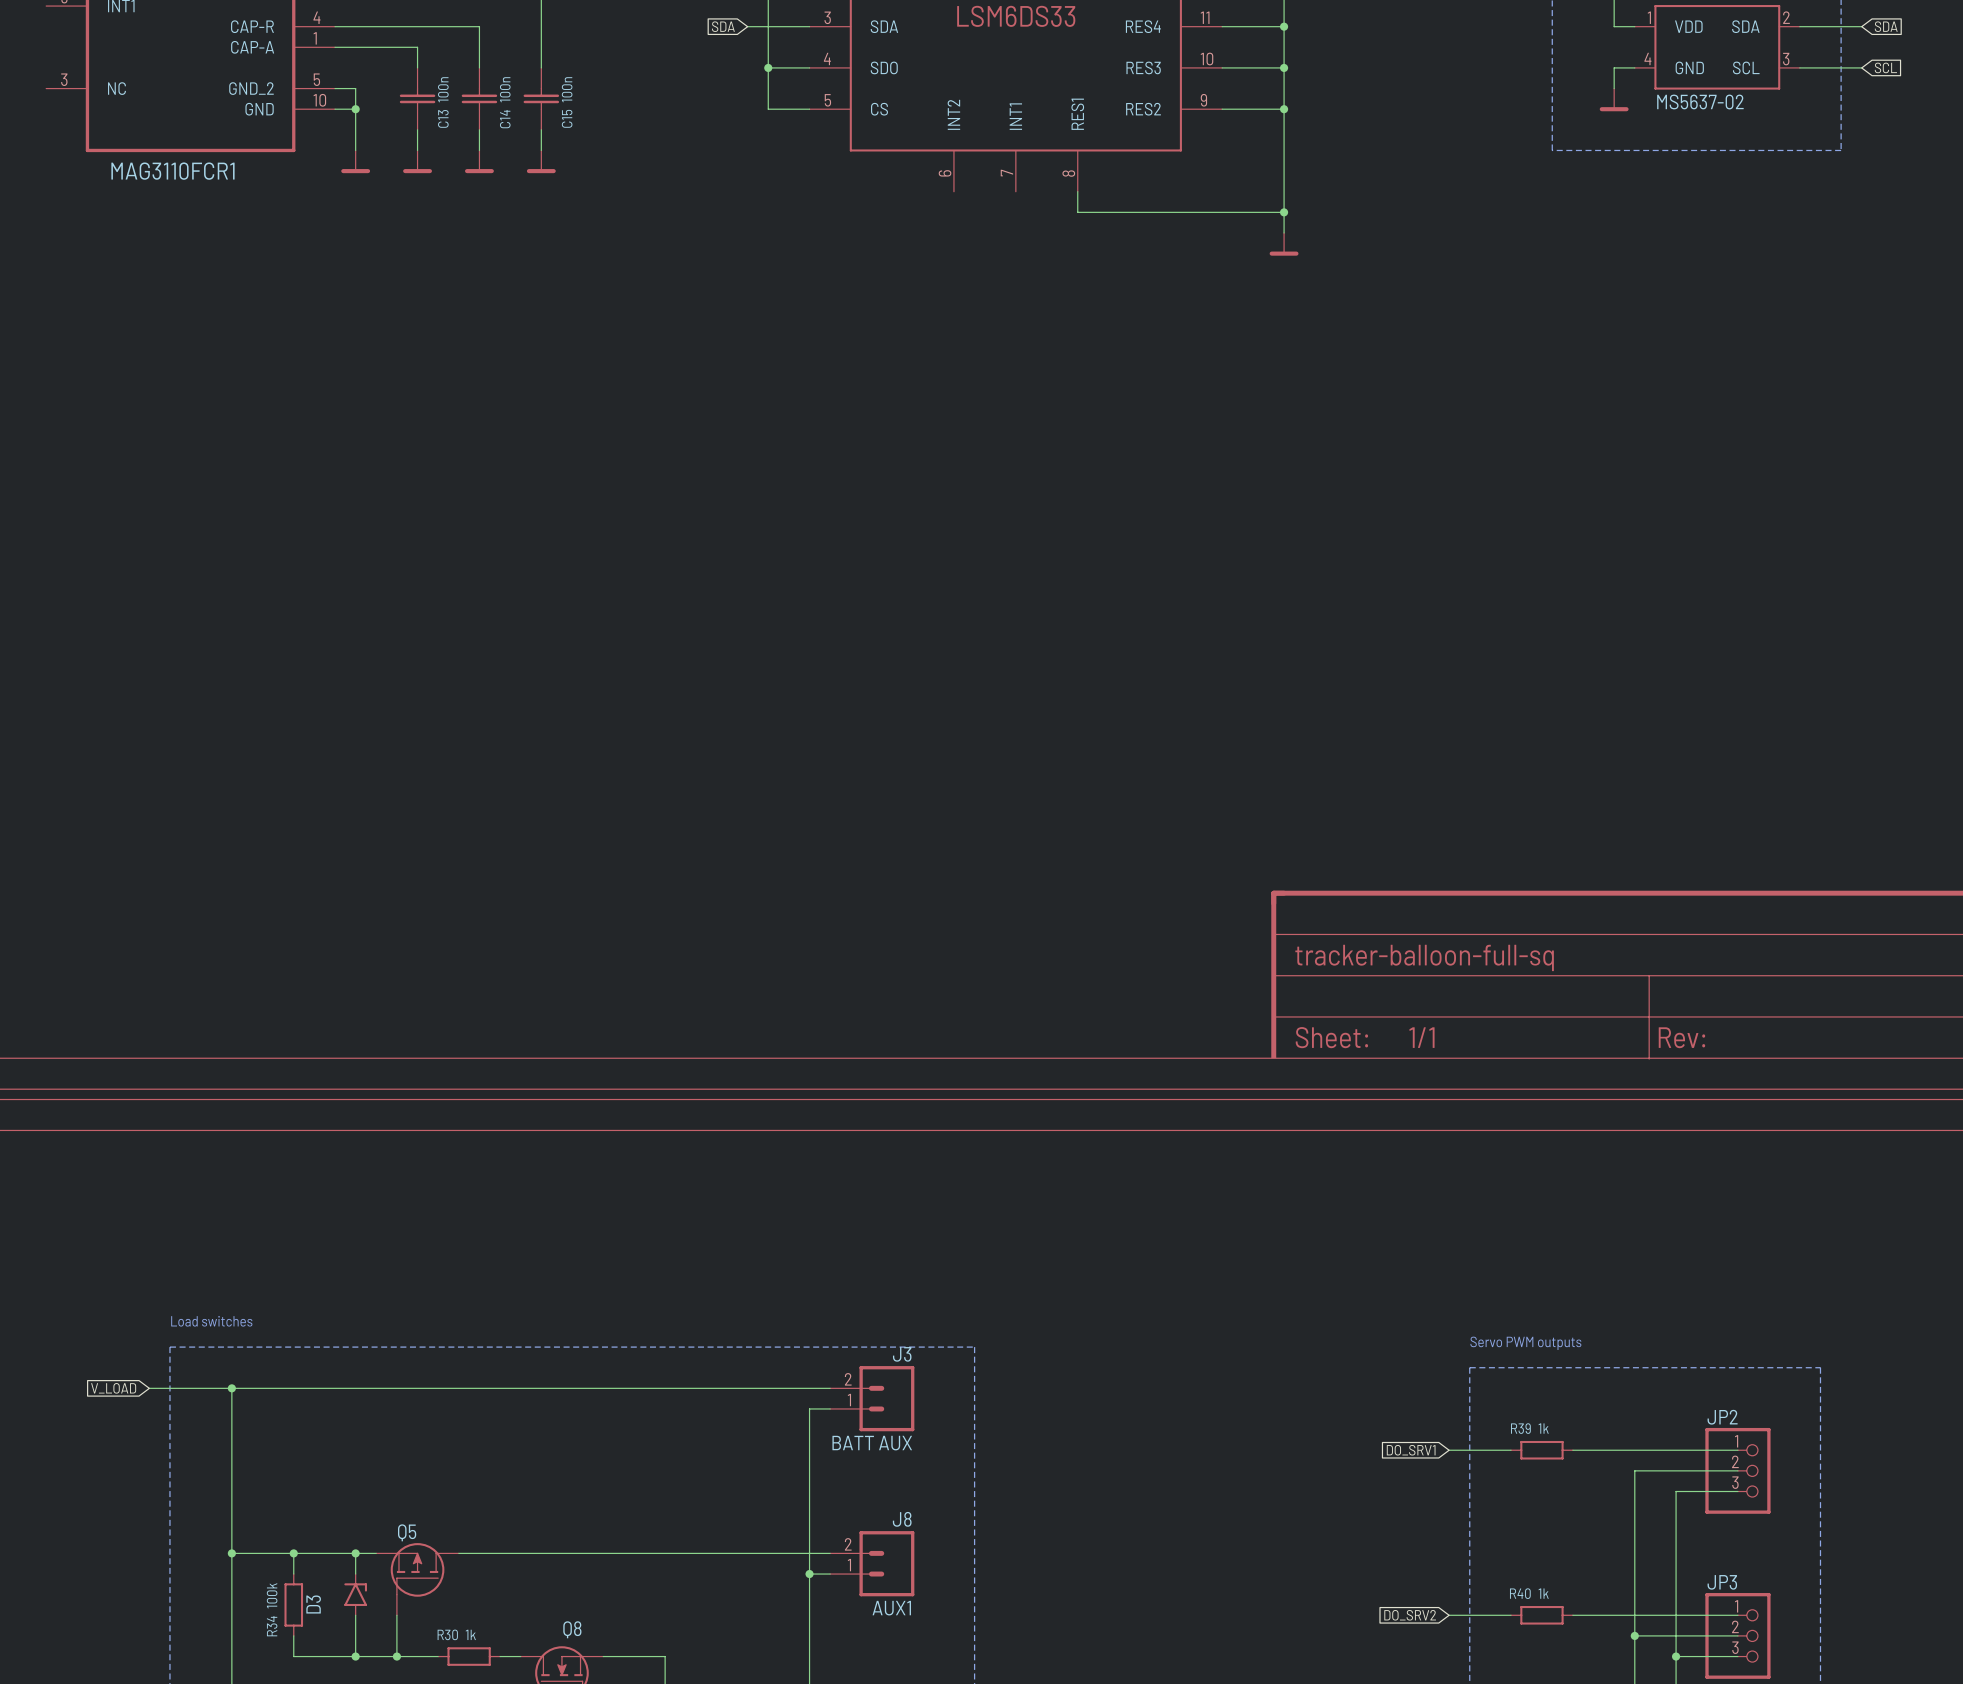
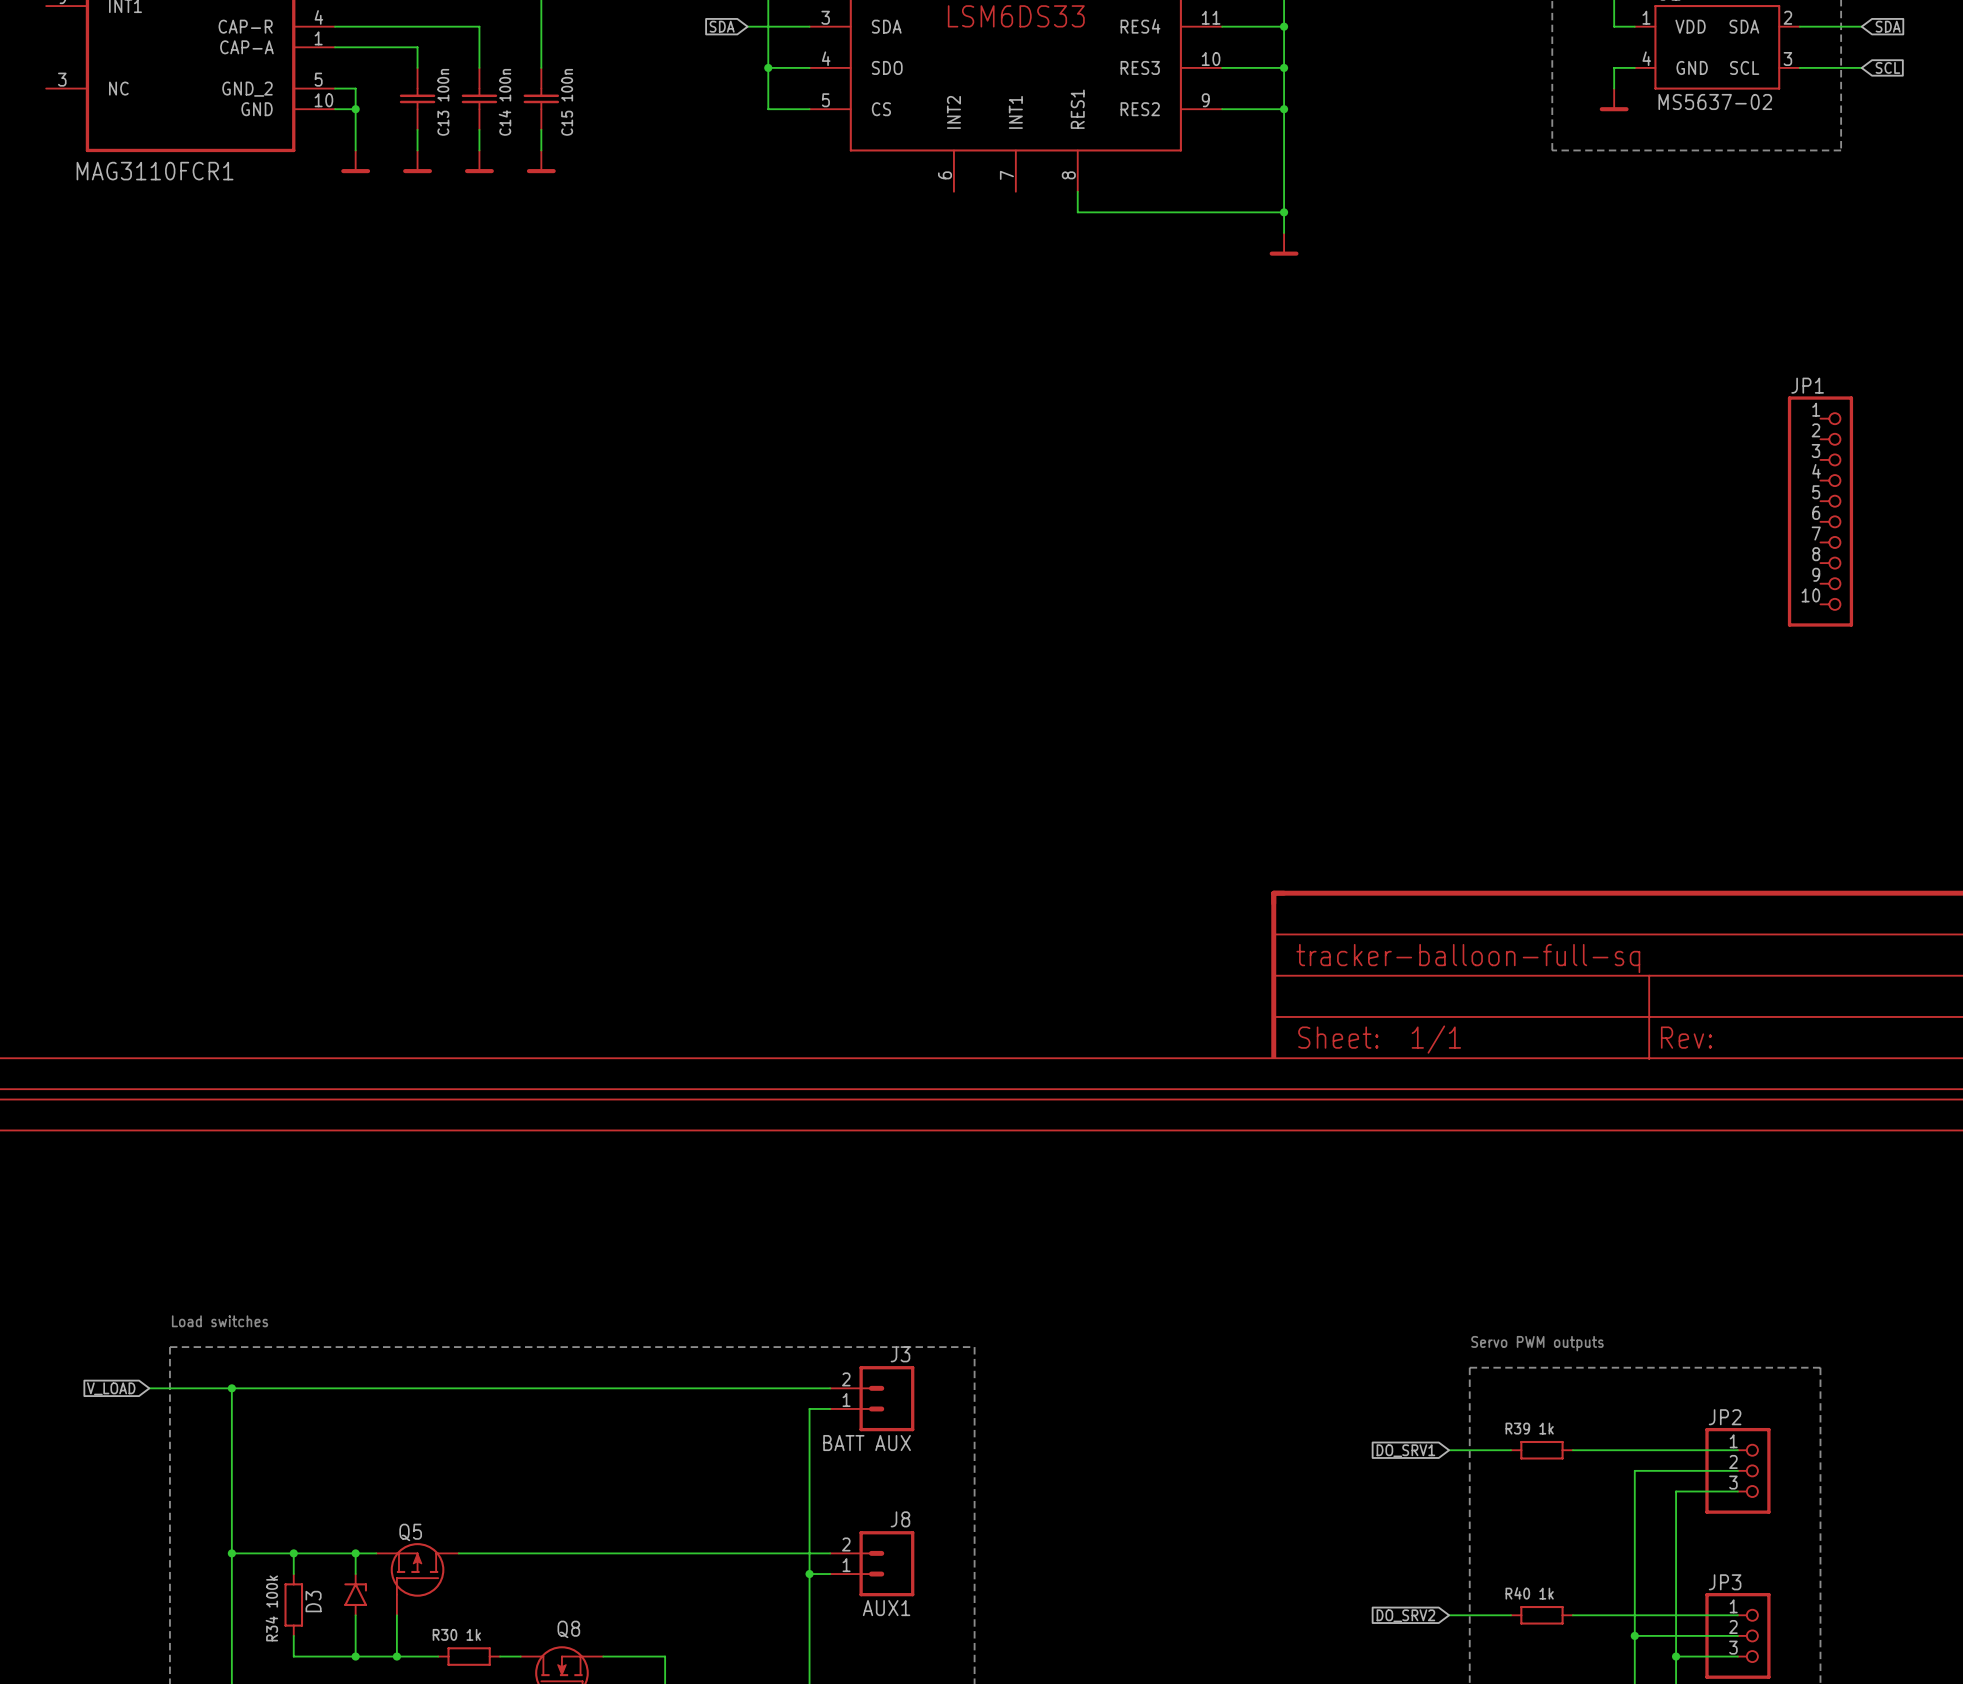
JP1: none -> (1820, 511)

